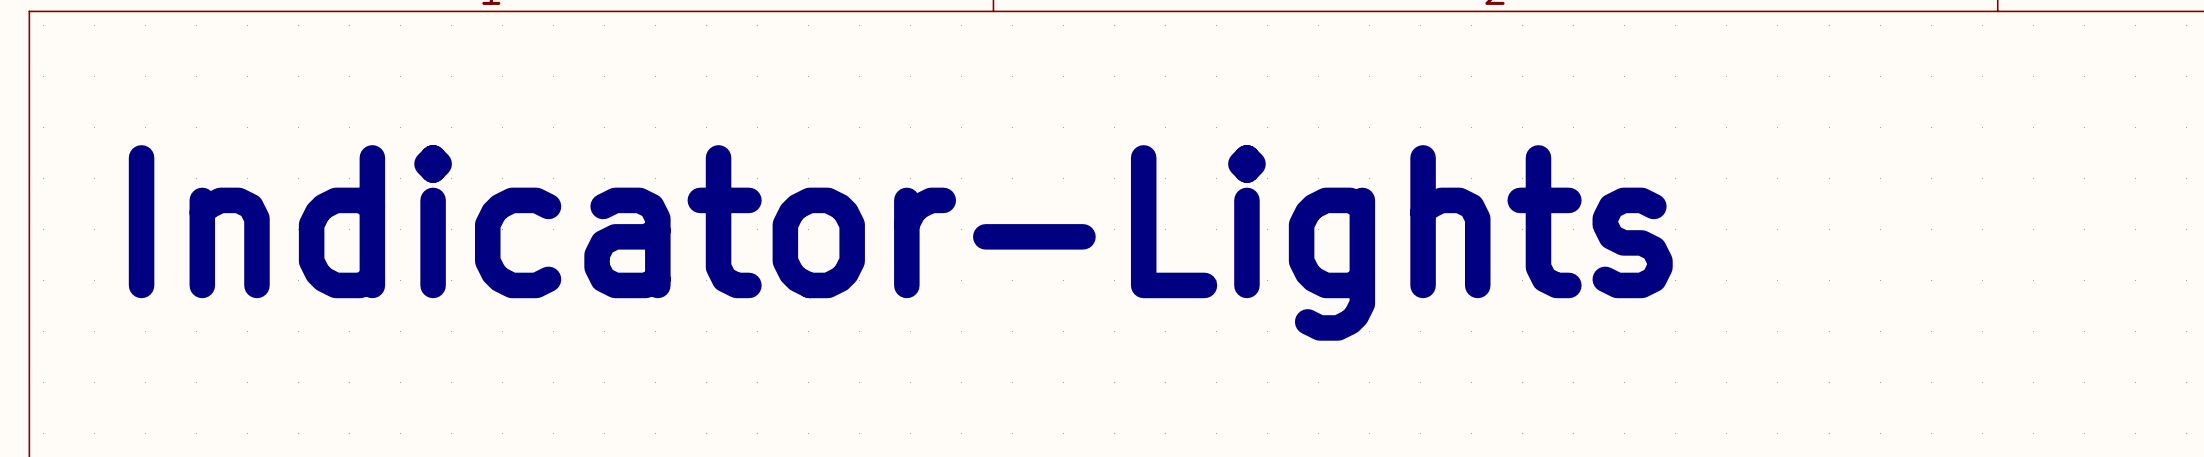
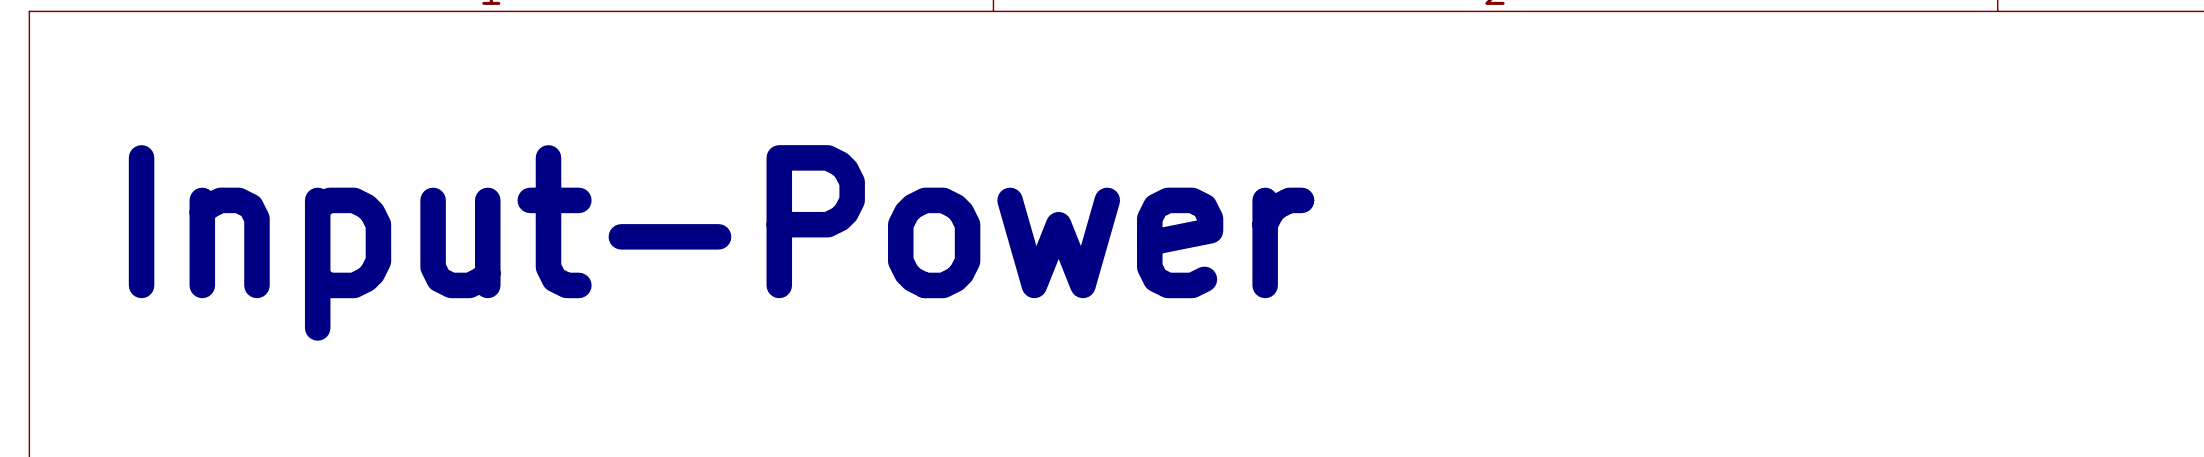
text: Indicator-Lights (900, 242) -> Input-Power (721, 242)

